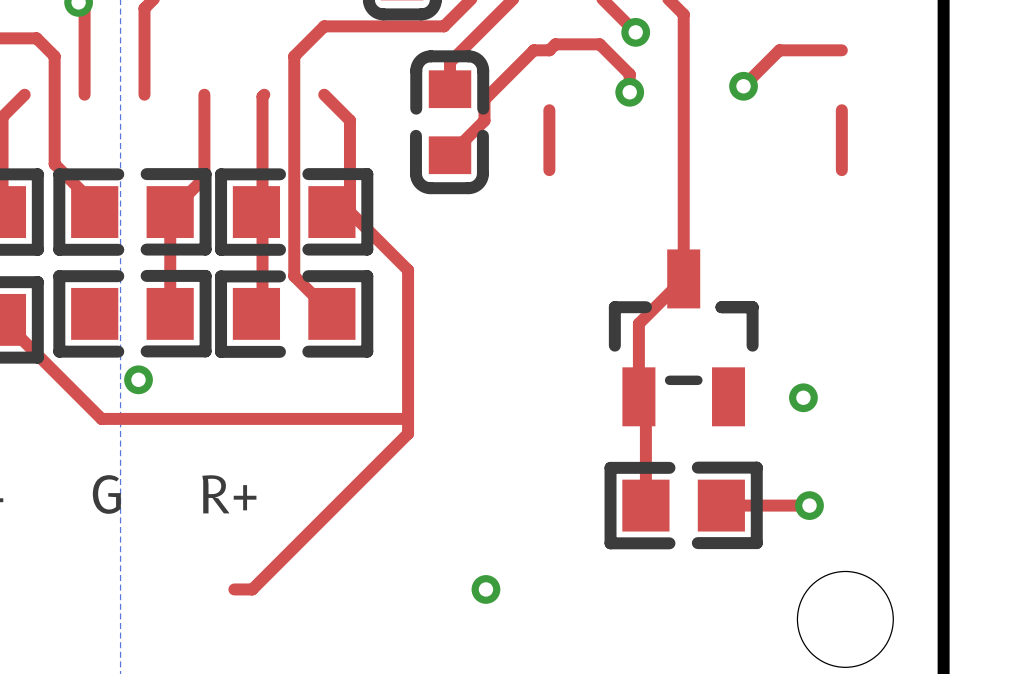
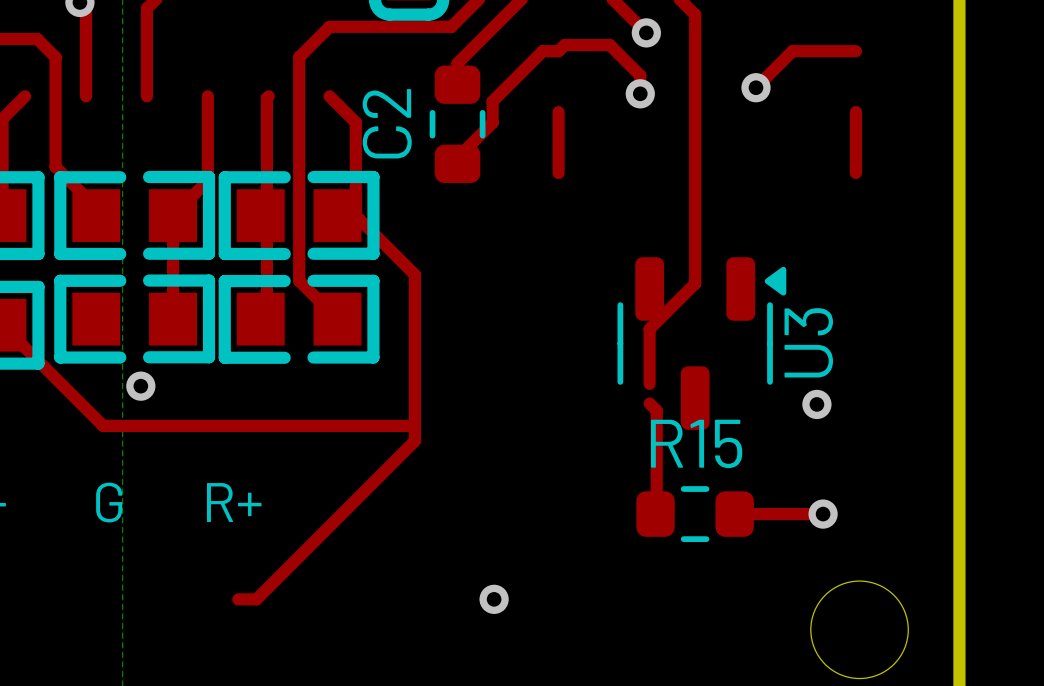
part: (449, 122) -> none
C2: none -> (457, 124)
part: (683, 337) -> none
U3: none -> (701, 343)
part: (683, 505) -> none
R15: none -> (695, 514)

